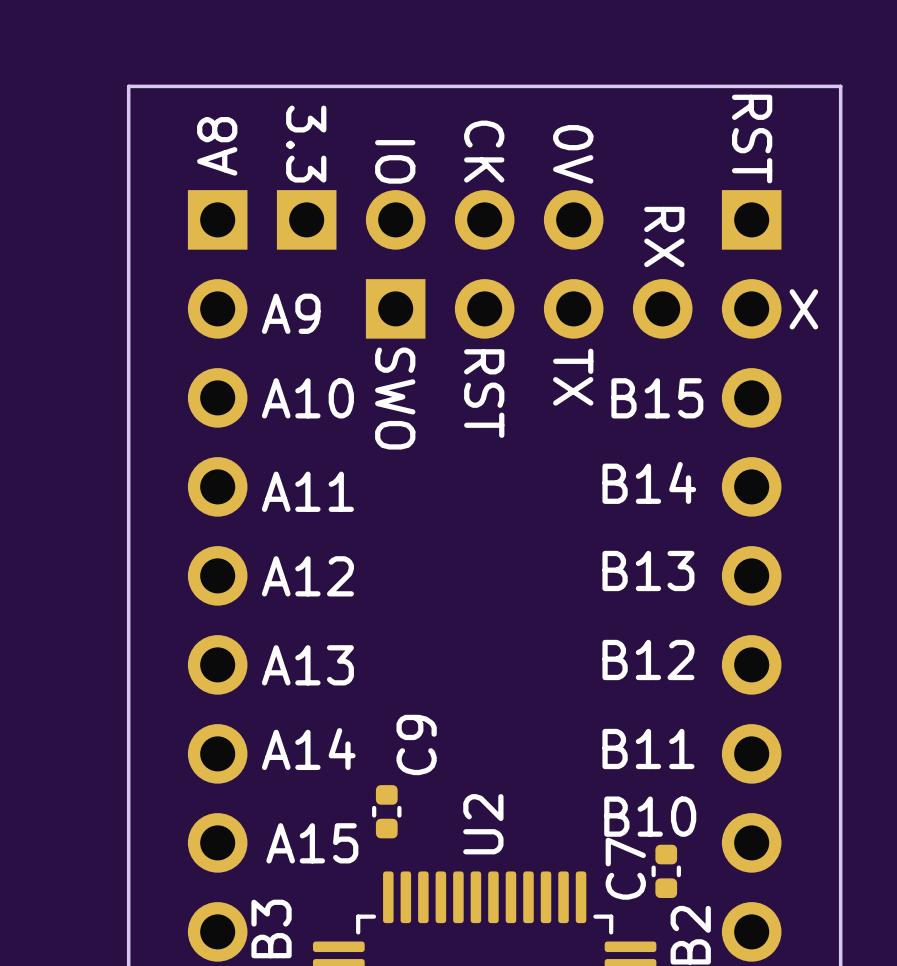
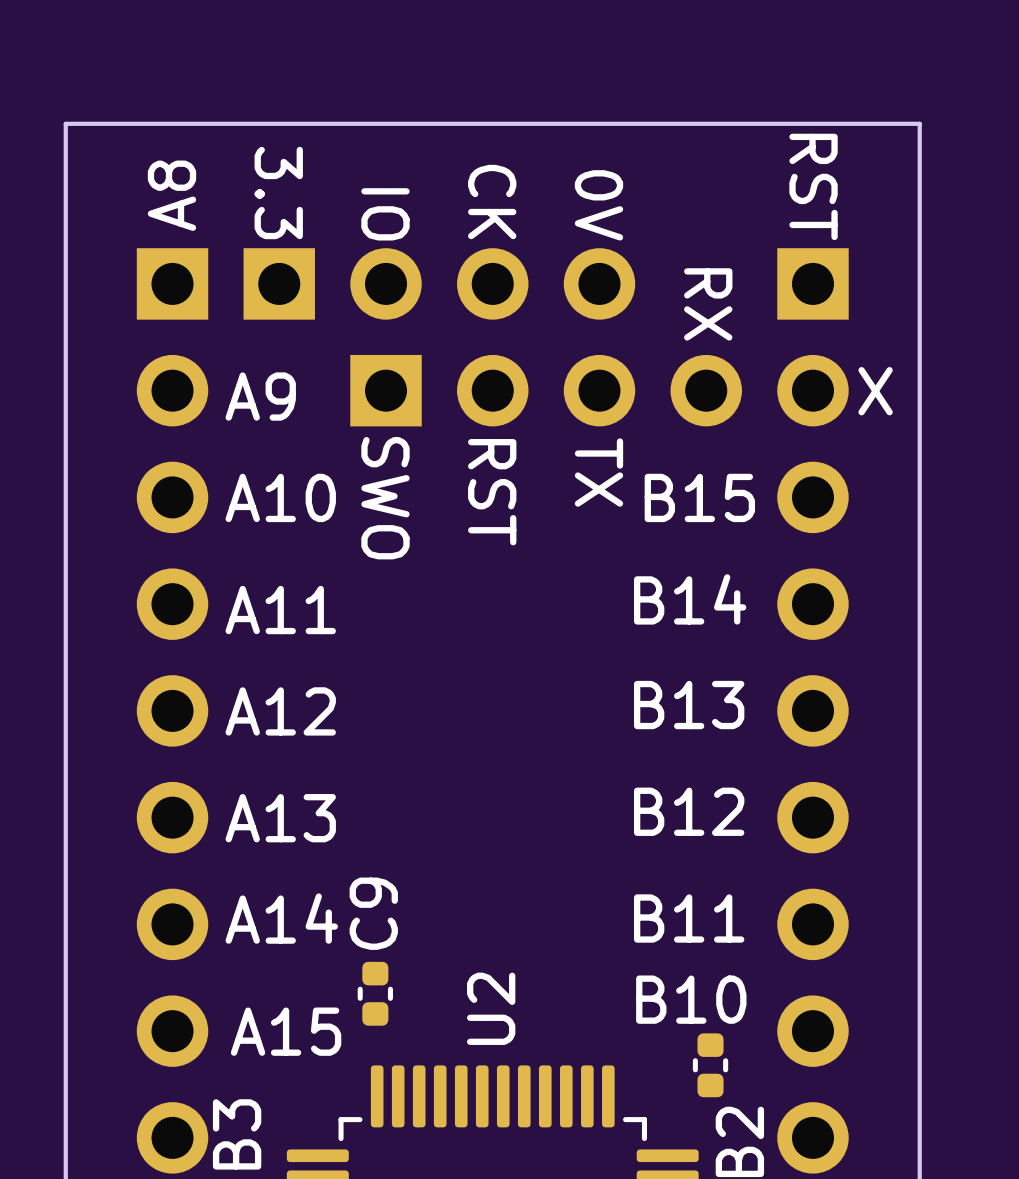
C9 name position: C9 (416, 744) -> C9 (373, 913)
C7 name: C7 (625, 868) -> none

